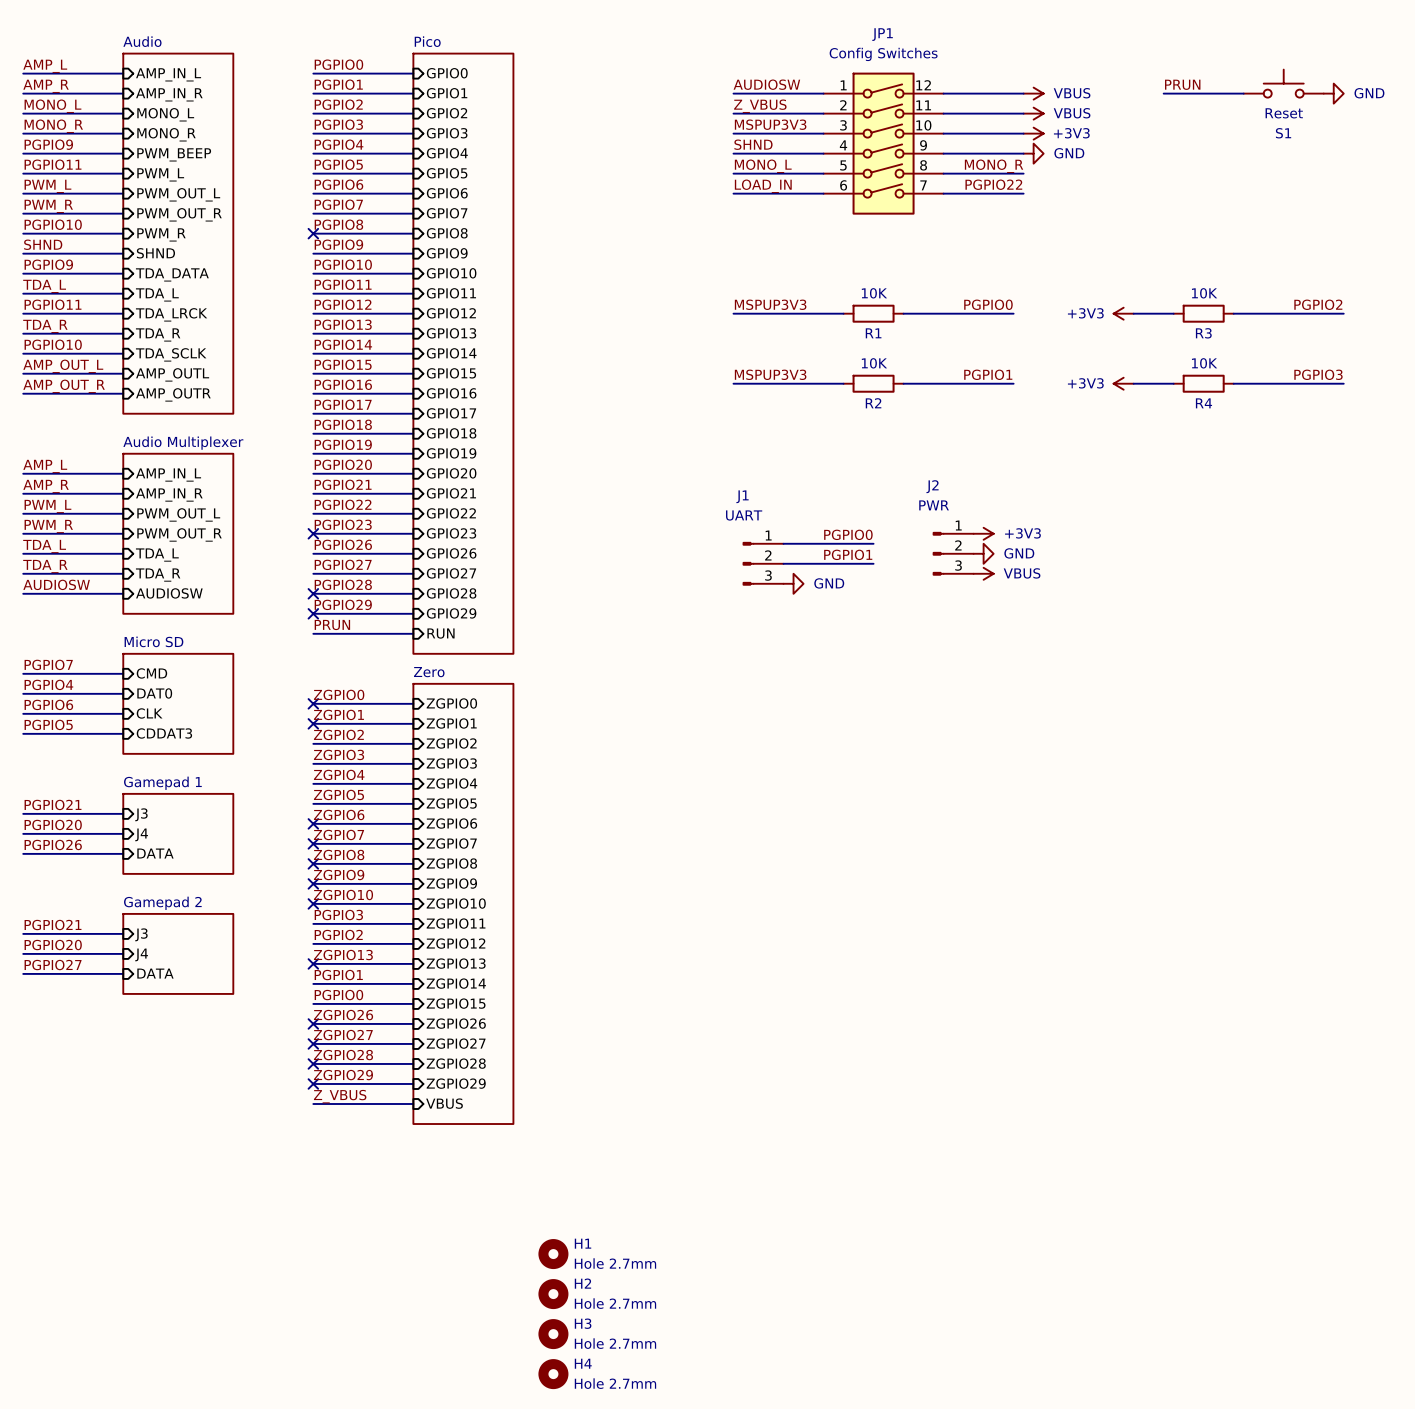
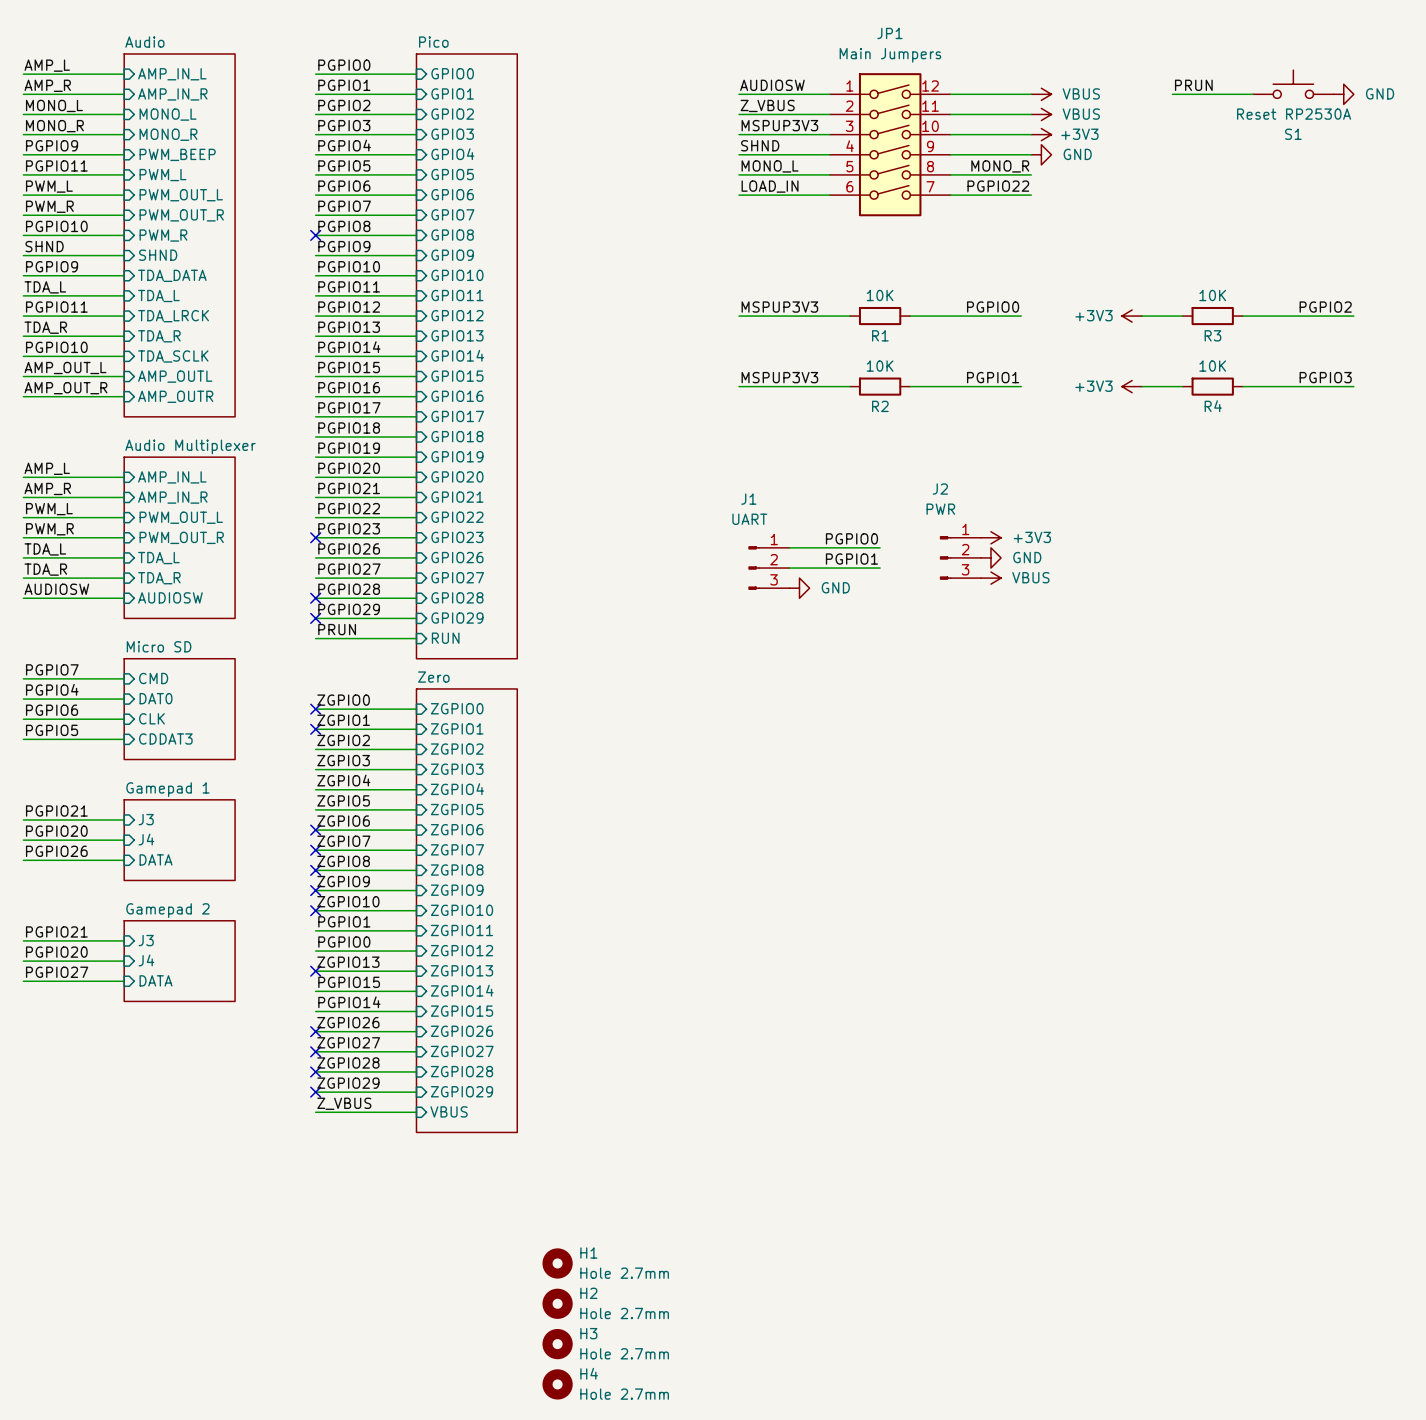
JP1 value: Config Switches (883, 54) -> Main Jumpers (890, 55)
S1 value: Reset (1284, 113) -> Reset RP2530A (1294, 114)
label: PGPIO3 (338, 915) -> PGPIO1 (344, 921)
label: PGPIO2 (338, 935) -> PGPIO0 (344, 942)
label: PGPIO1 (338, 975) -> PGPIO15 (349, 982)
label: PGPIO0 (338, 995) -> PGPIO14 (349, 1002)

